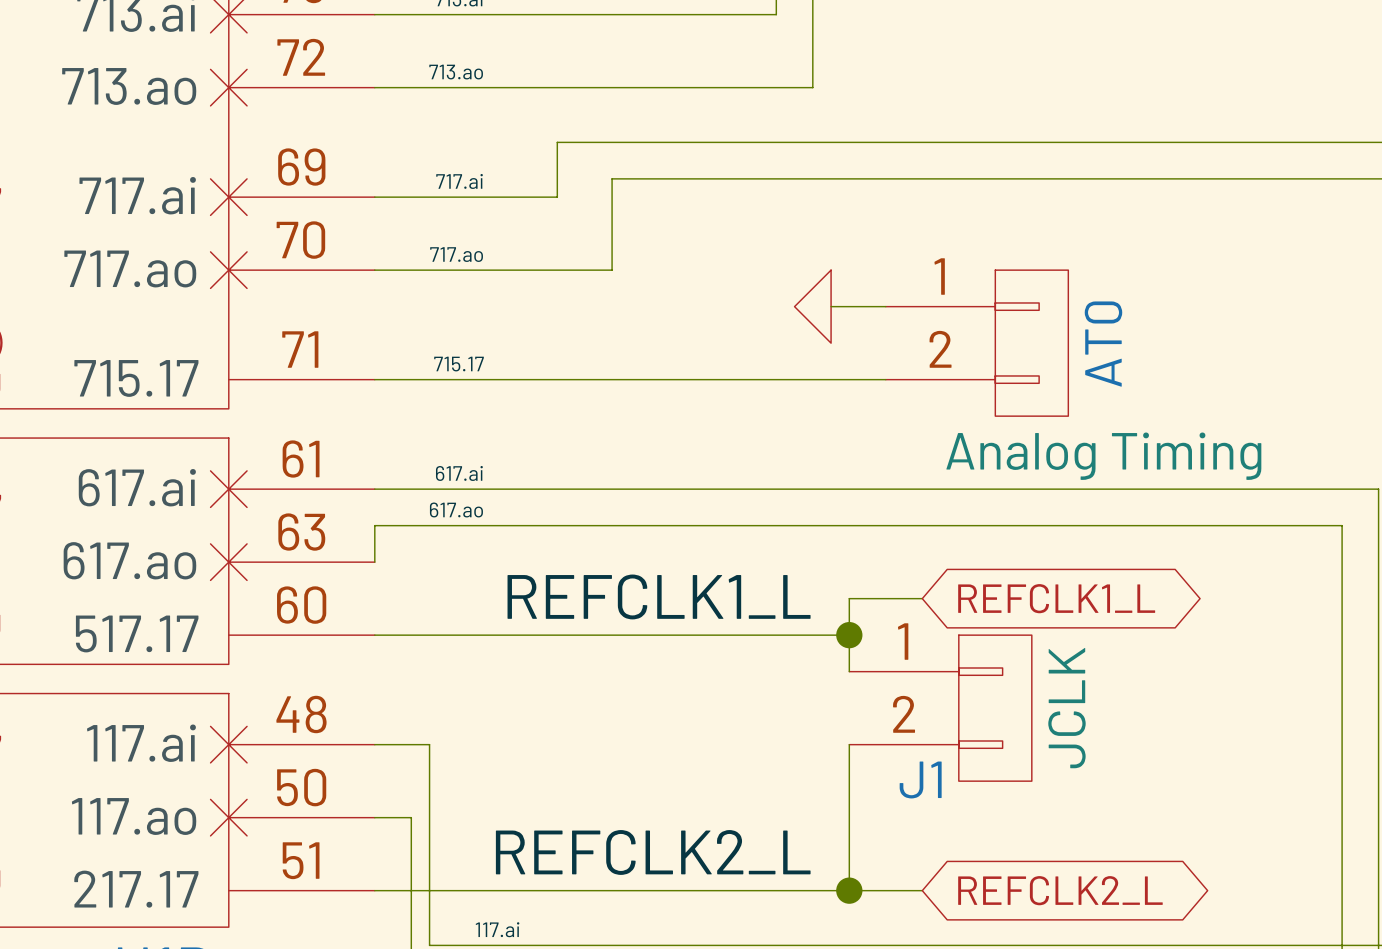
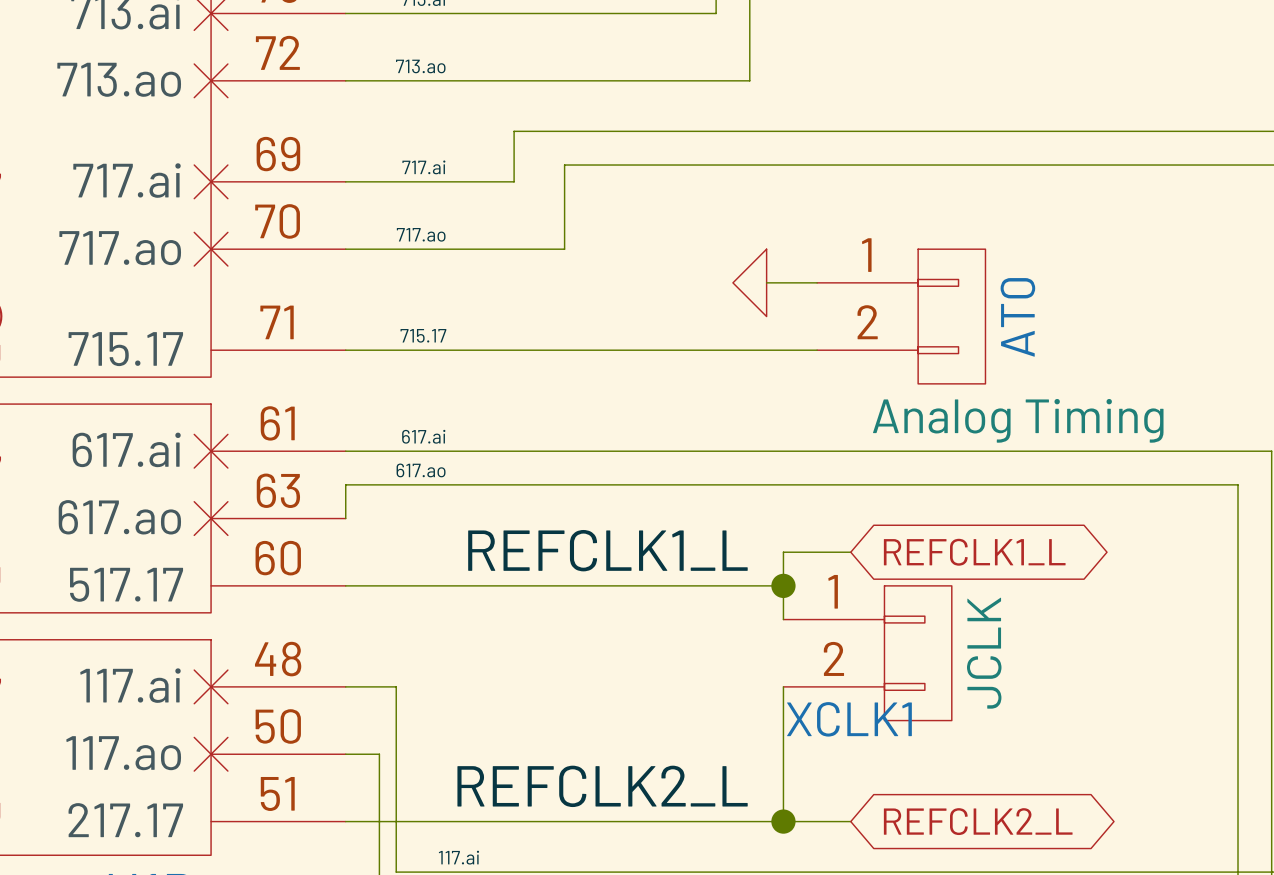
J1 name: J1 (920, 779) -> XCLK1 (849, 719)

